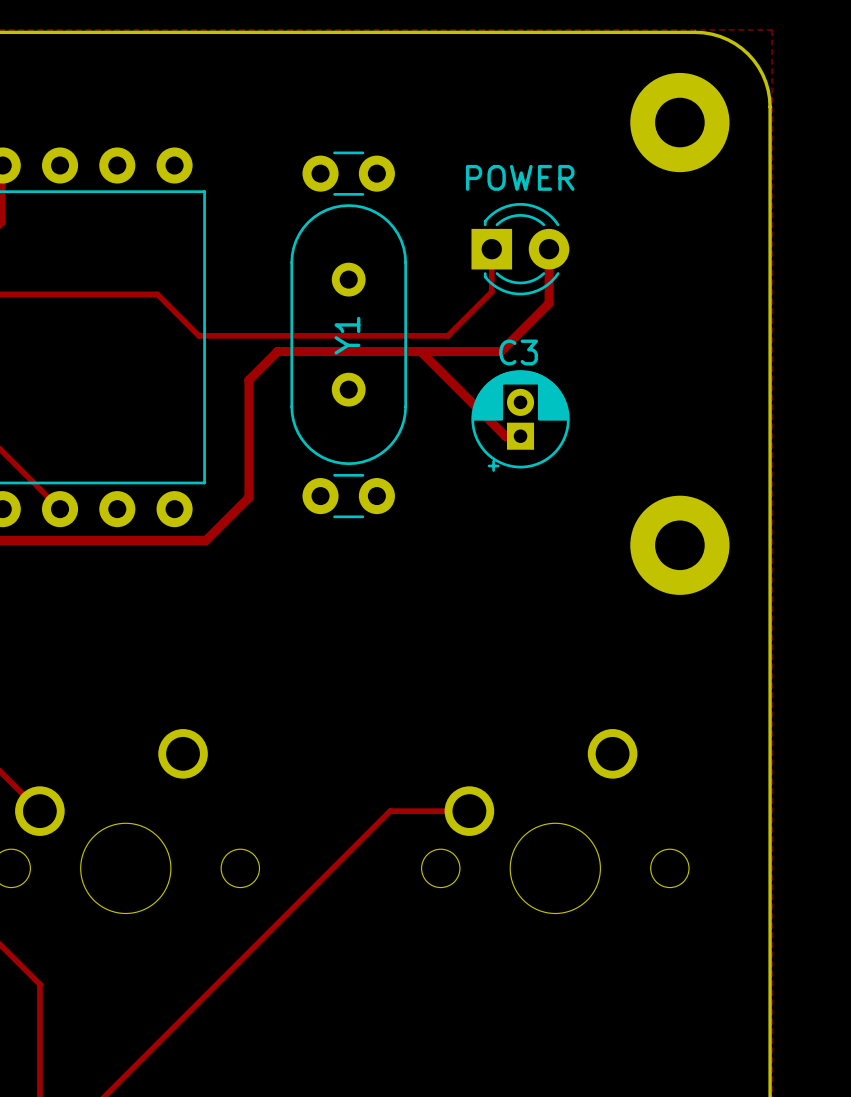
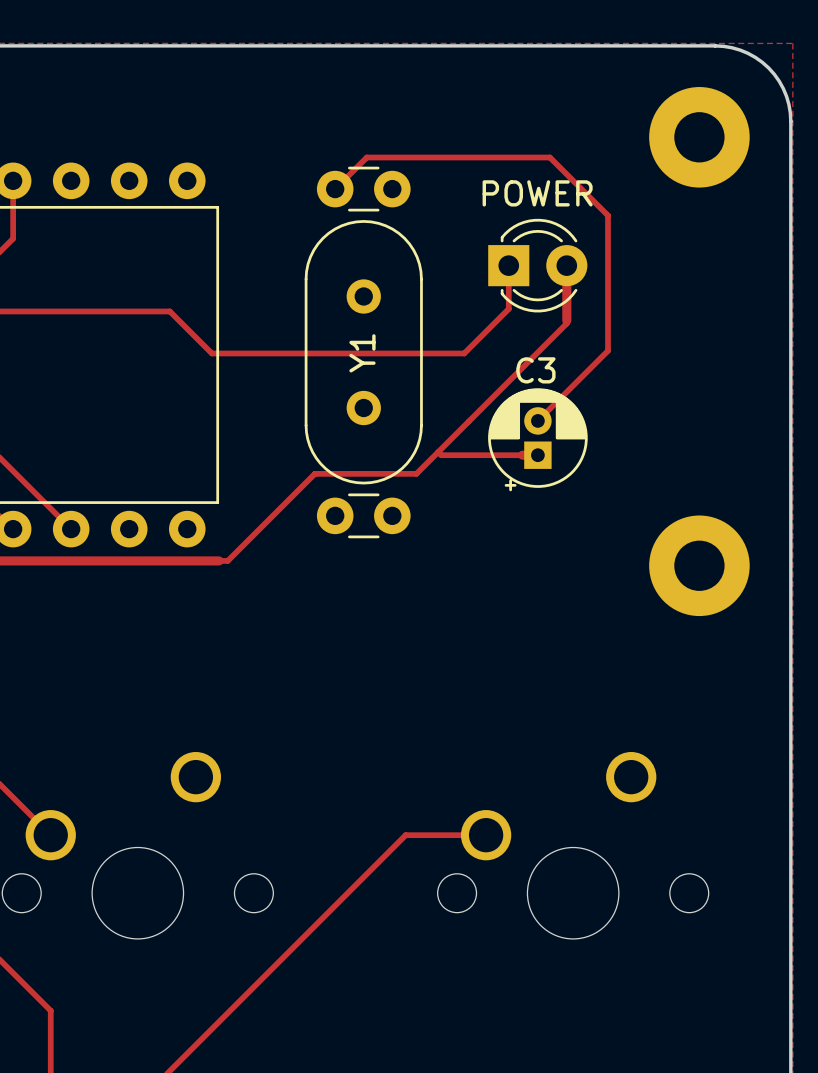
track: none -> (335, 189) (366, 157) (549, 157) (607, 215) (607, 350) (537, 420)
track: (549, 303) (500, 351) (277, 351) (248, 380) (248, 497) (205, 540) -> (566, 320) (566, 323) (416, 473) (314, 473) (227, 560) (219, 560)
track: (420, 351) (505, 436) -> (438, 452) (441, 455) (522, 455)

